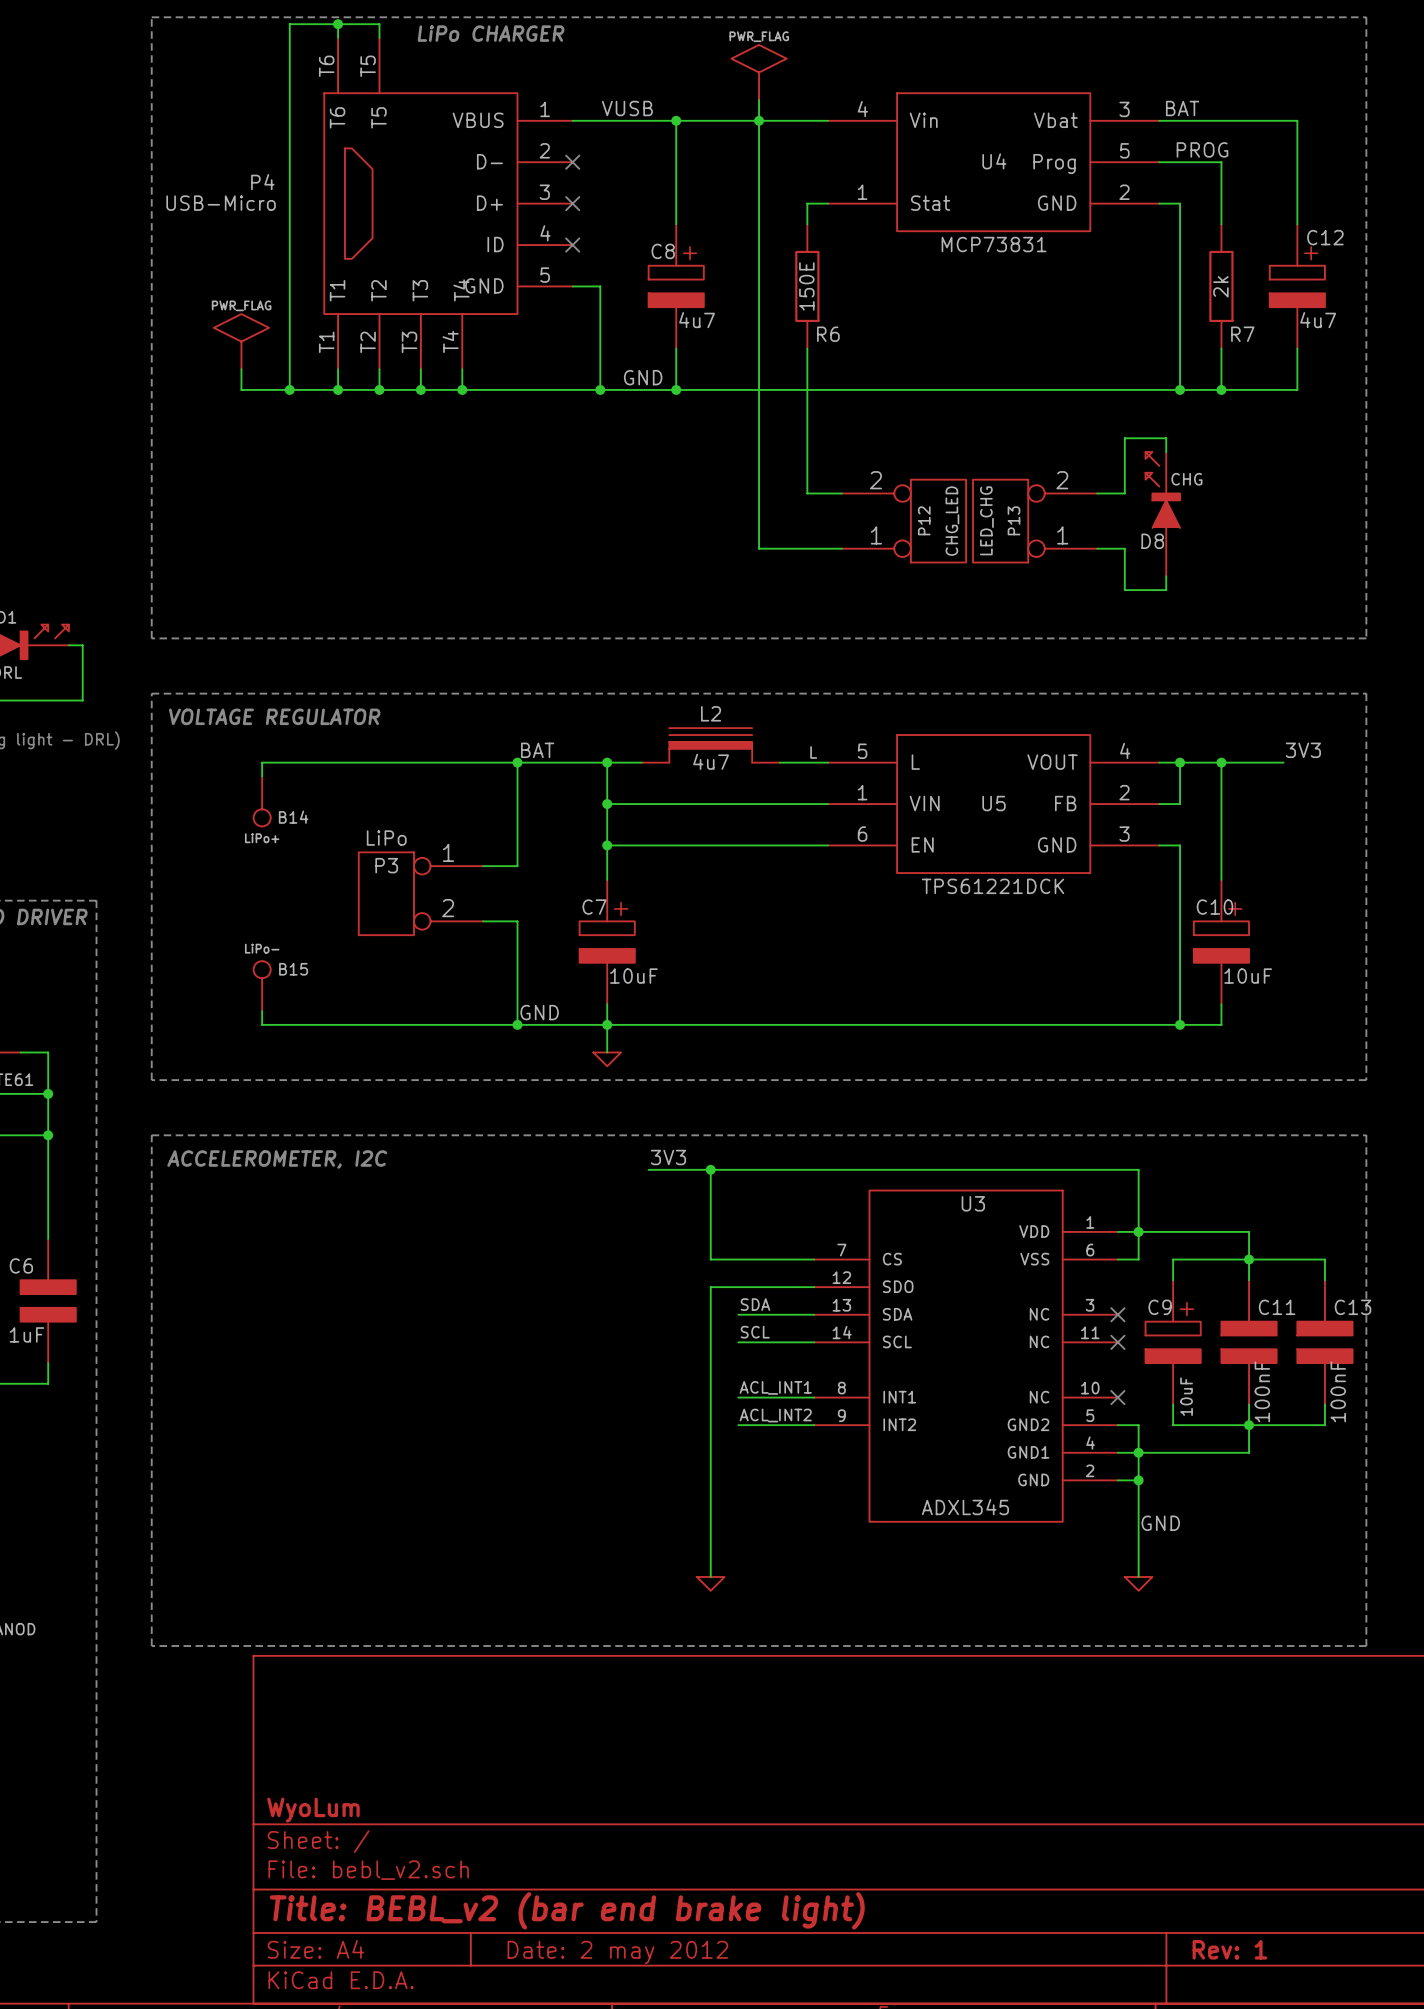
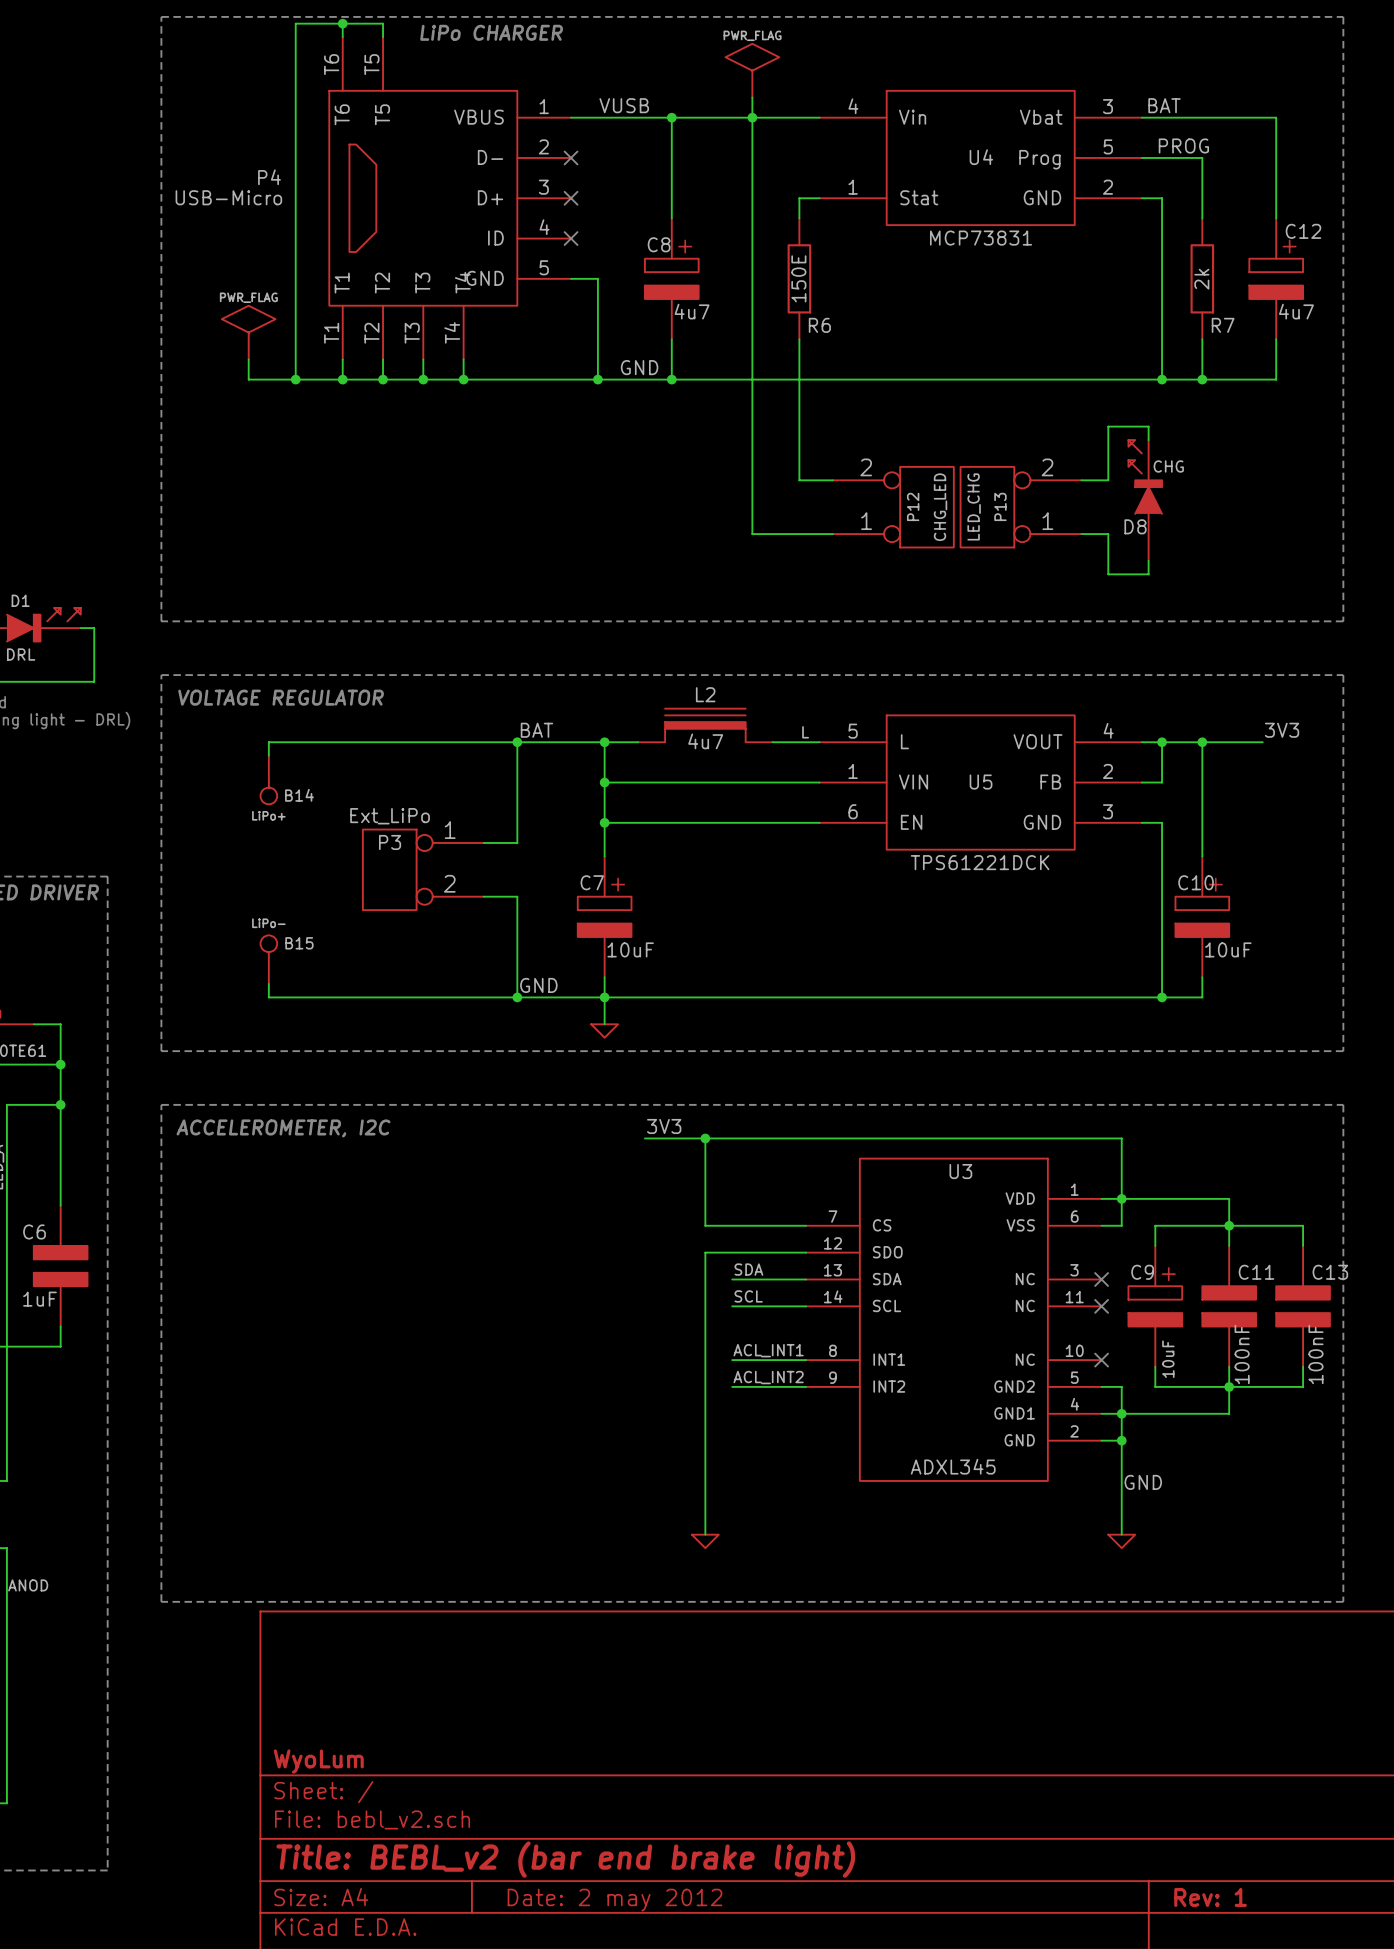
P3 value: LiPo (386, 838) -> Ext_LiPo (390, 816)

